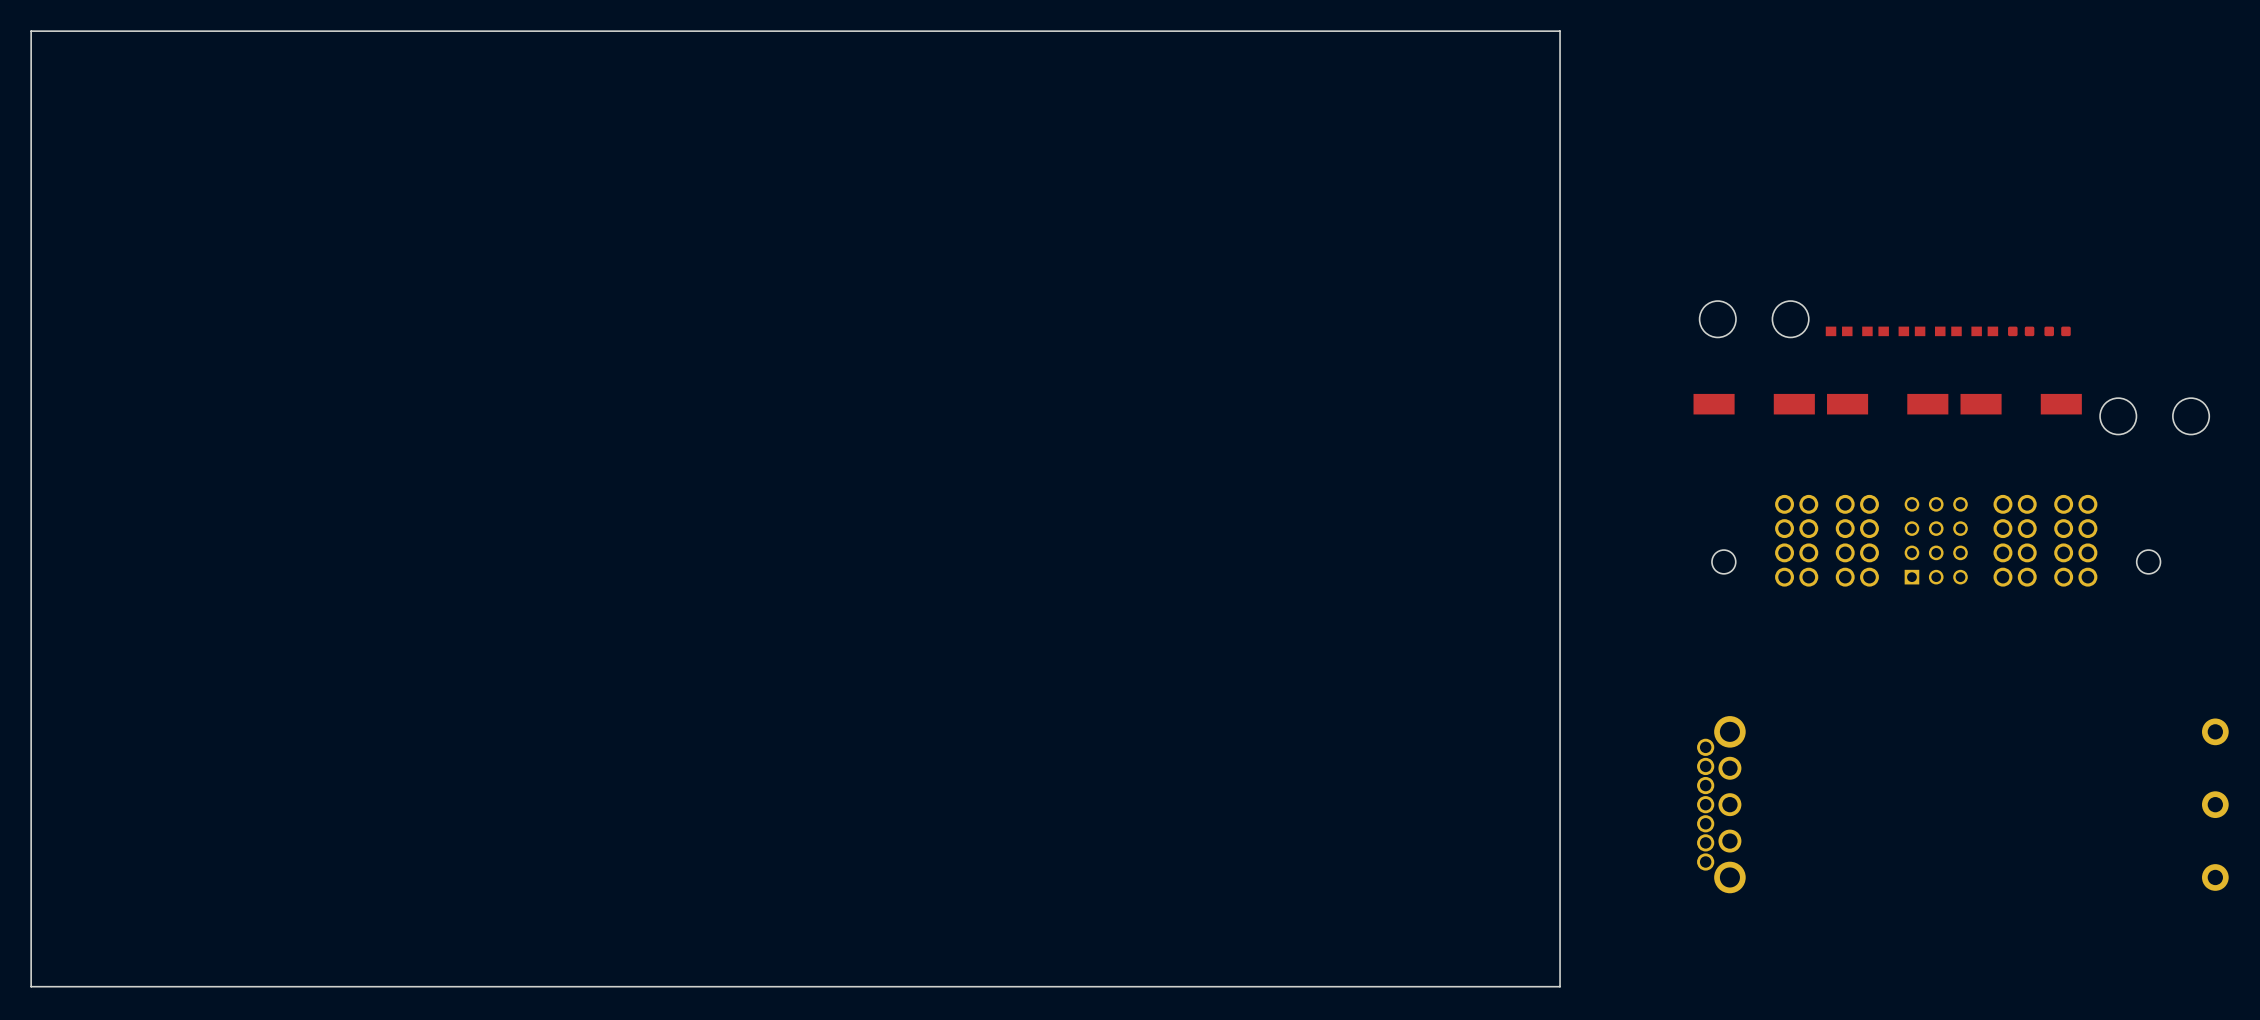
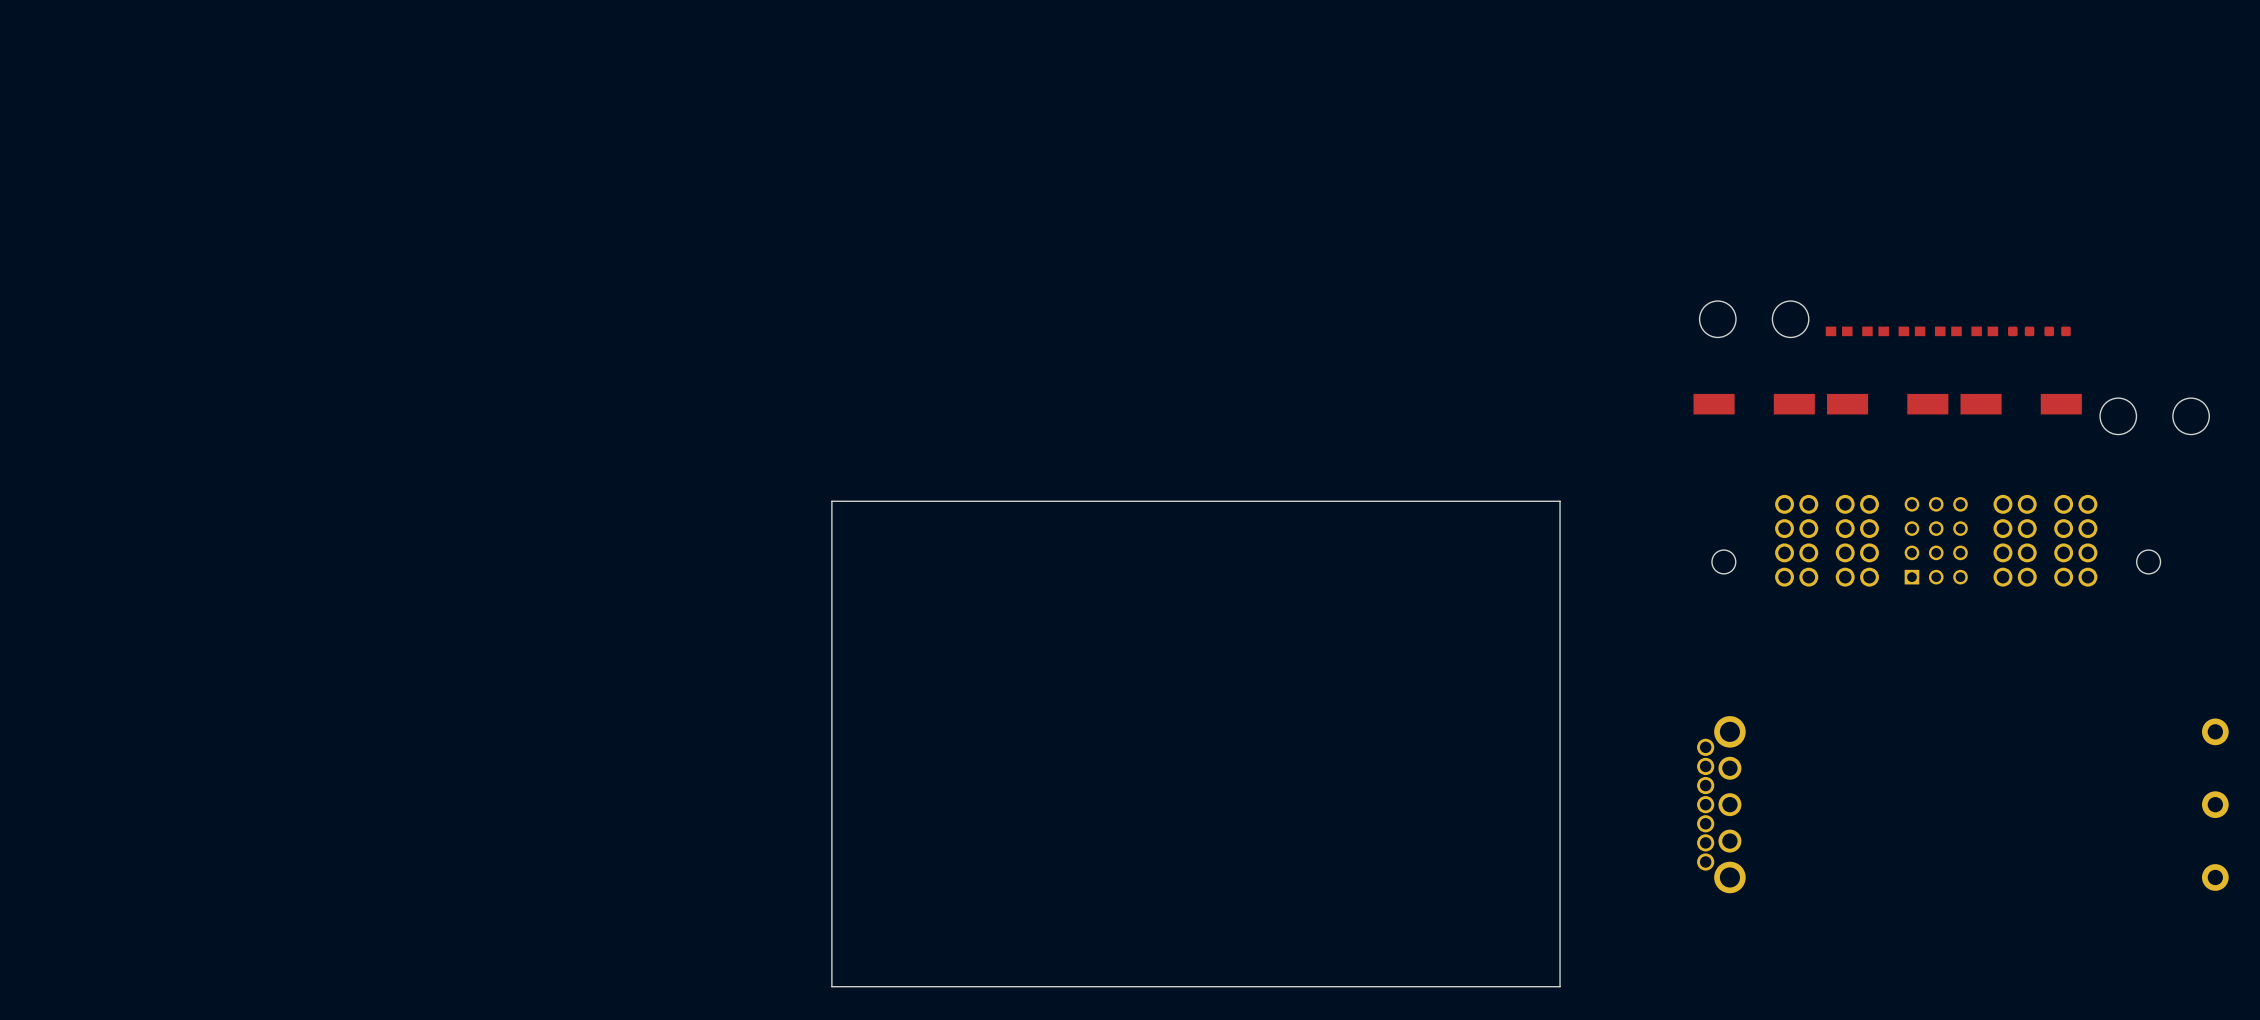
board edge: (1560, 501) (1560, 31) (31, 31) (31, 986) (831, 986) -> (1560, 501) (831, 501) (831, 986)

